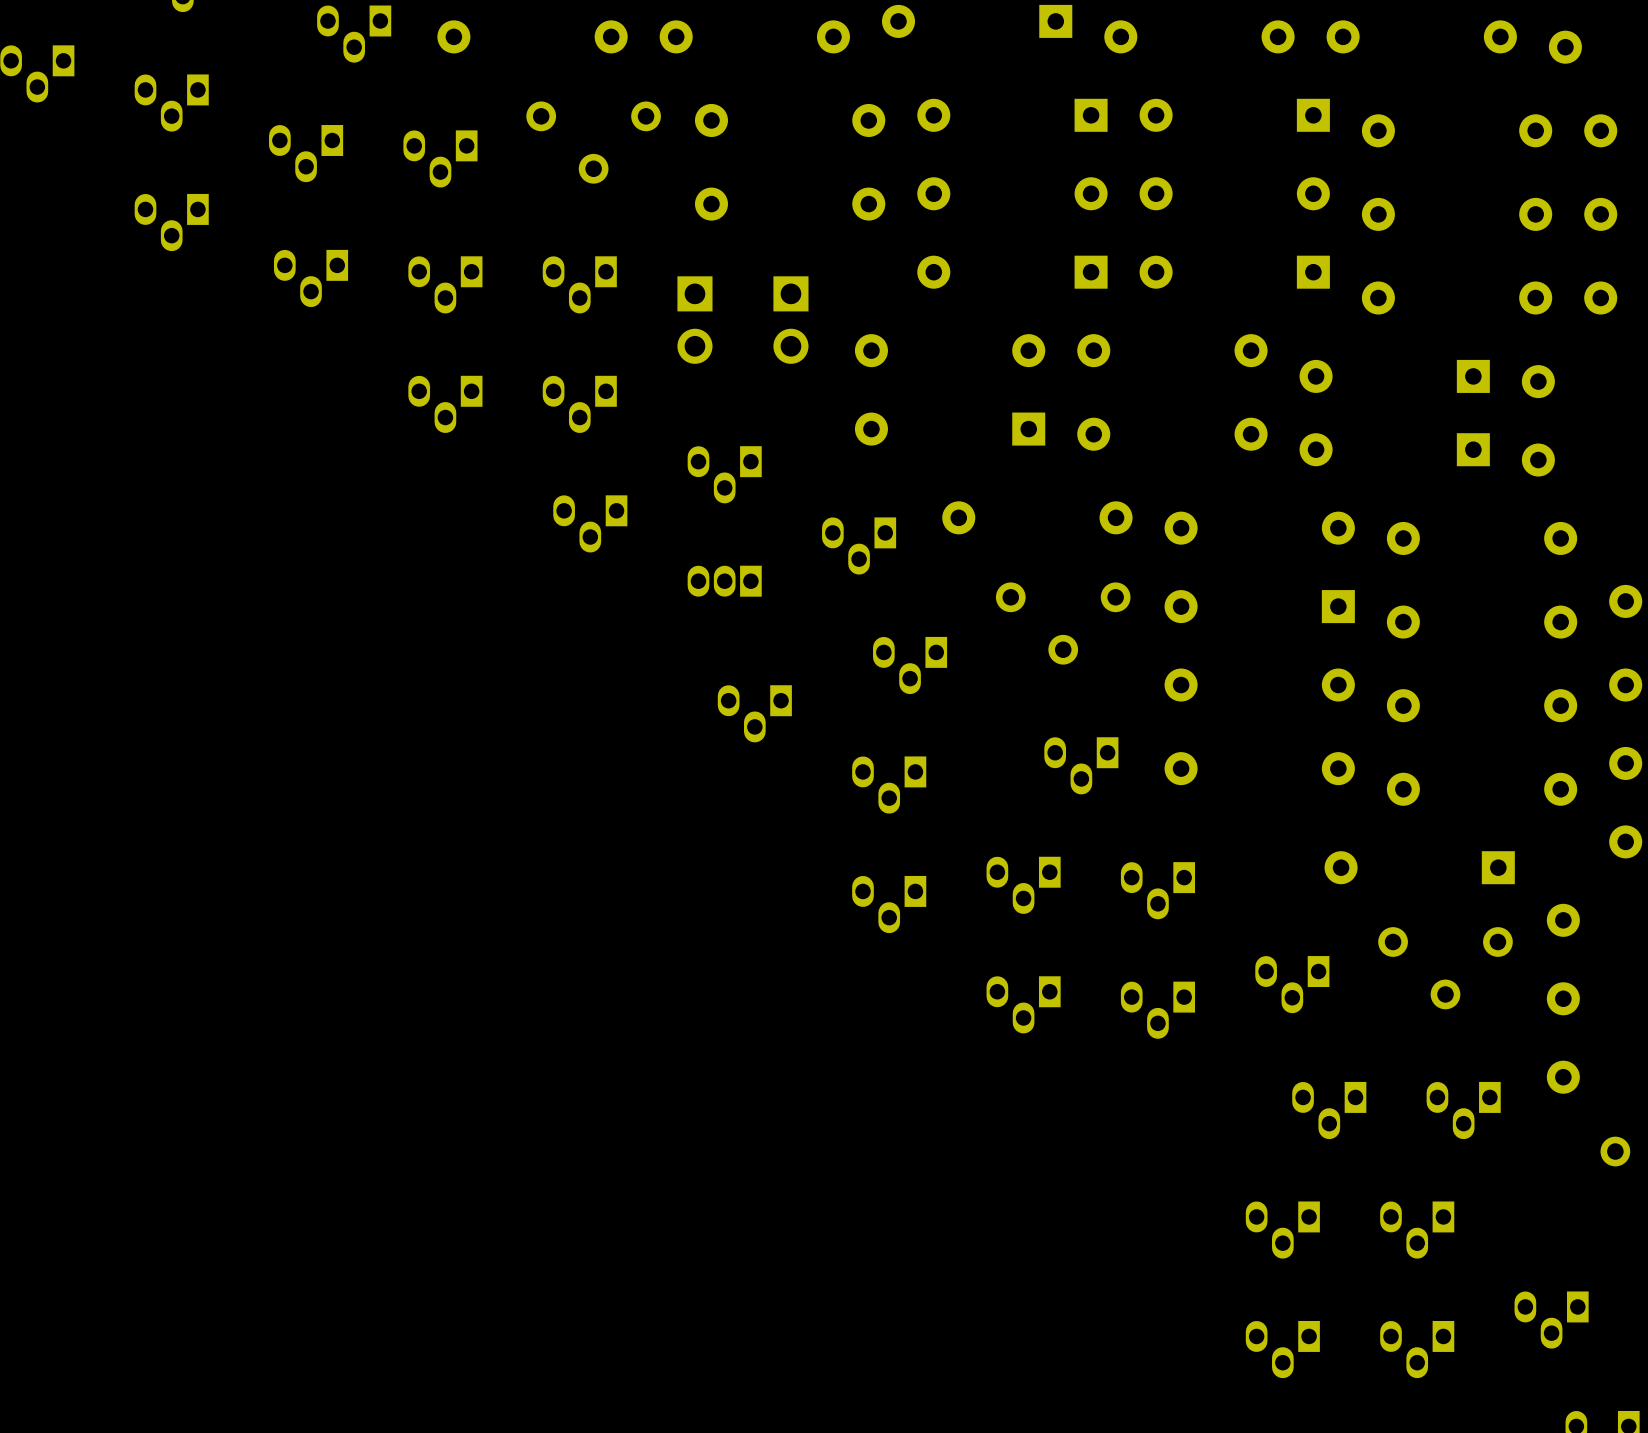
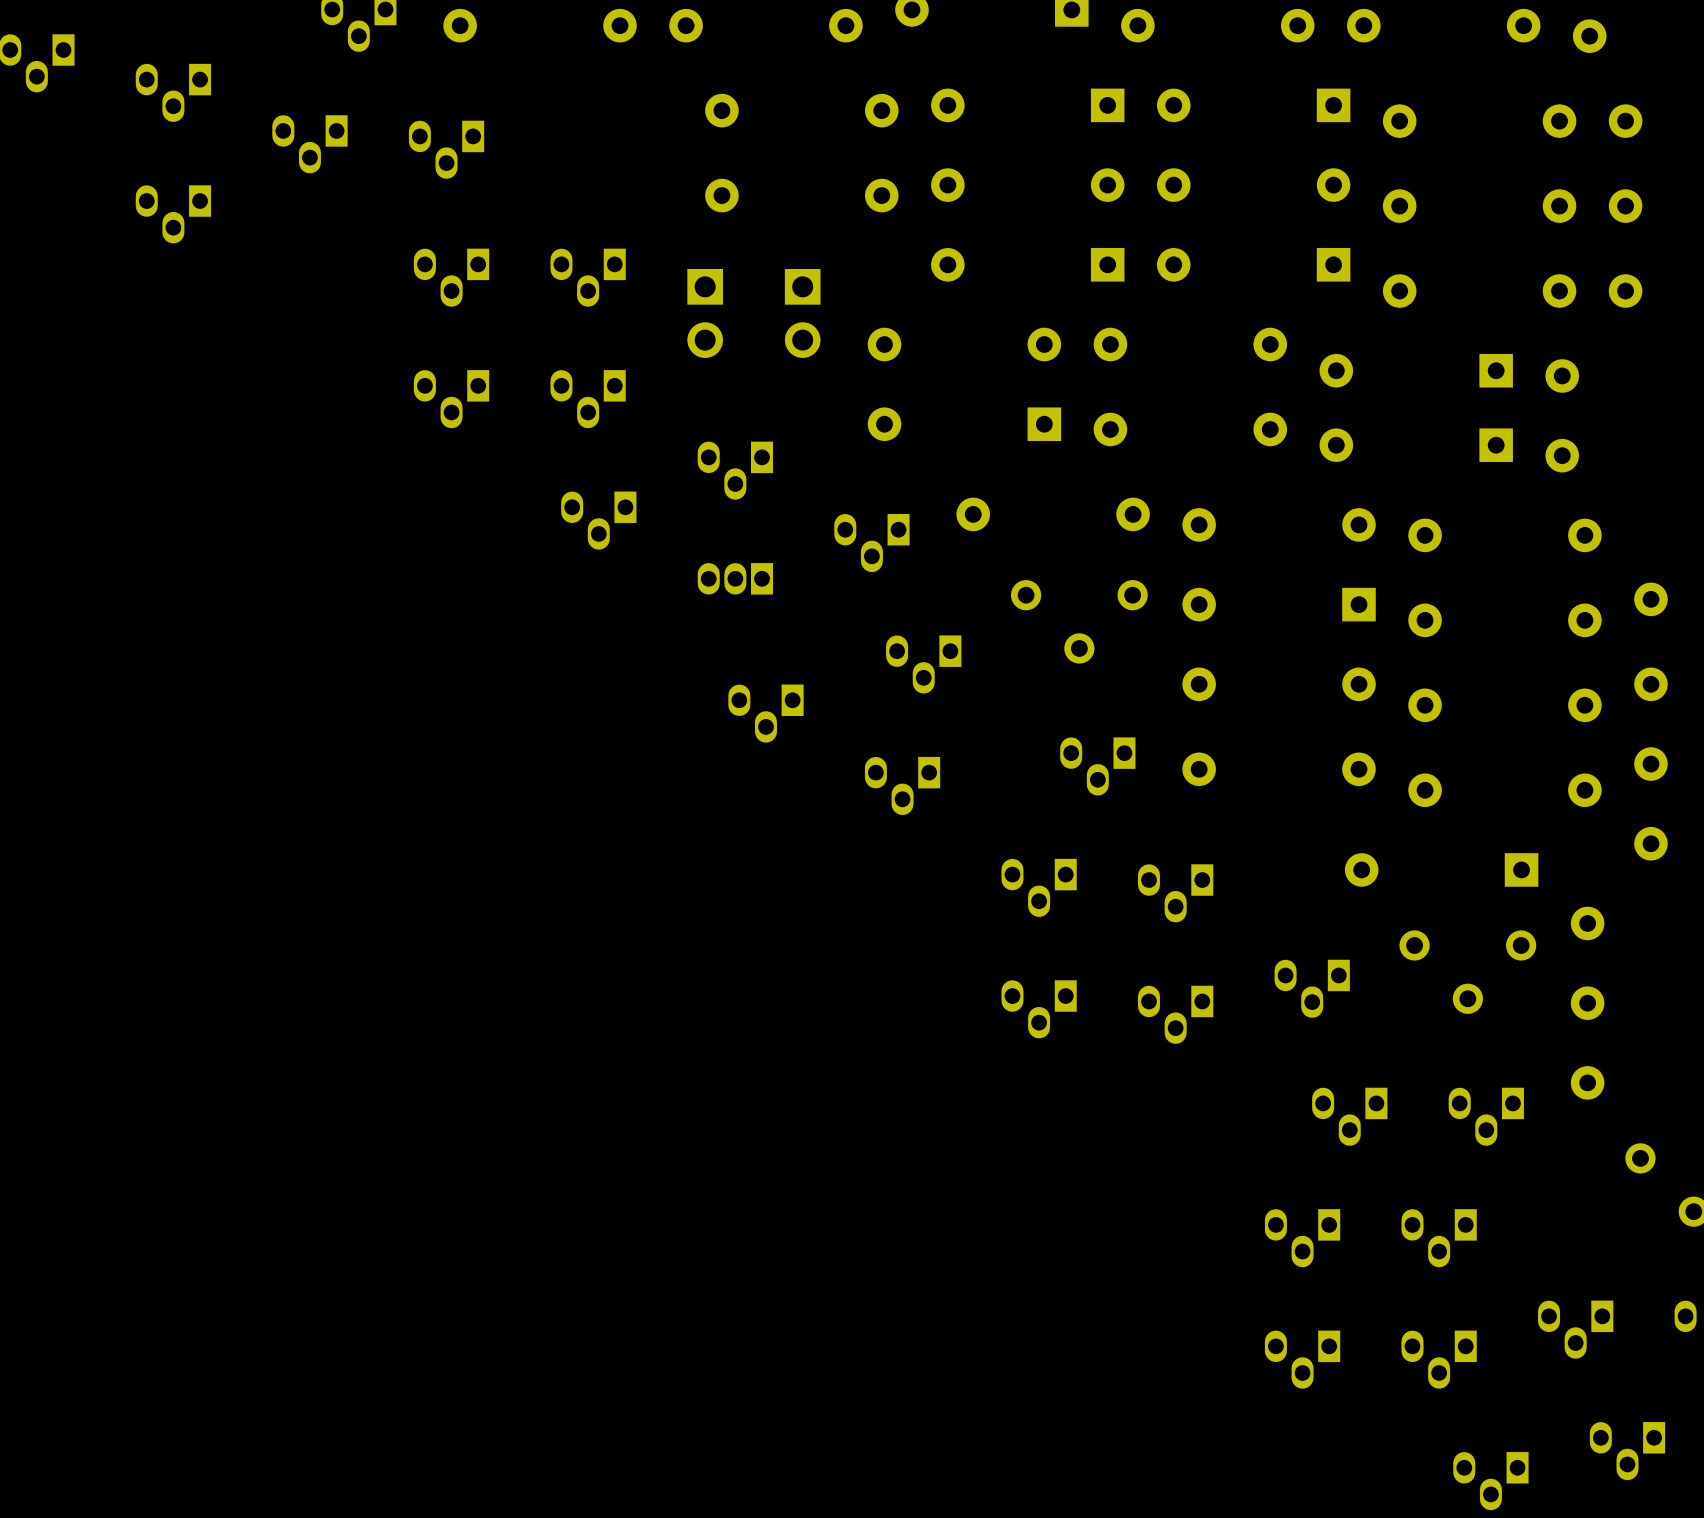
part: (593, 142) -> none
part: (311, 278) -> none
part: (889, 904) -> none

